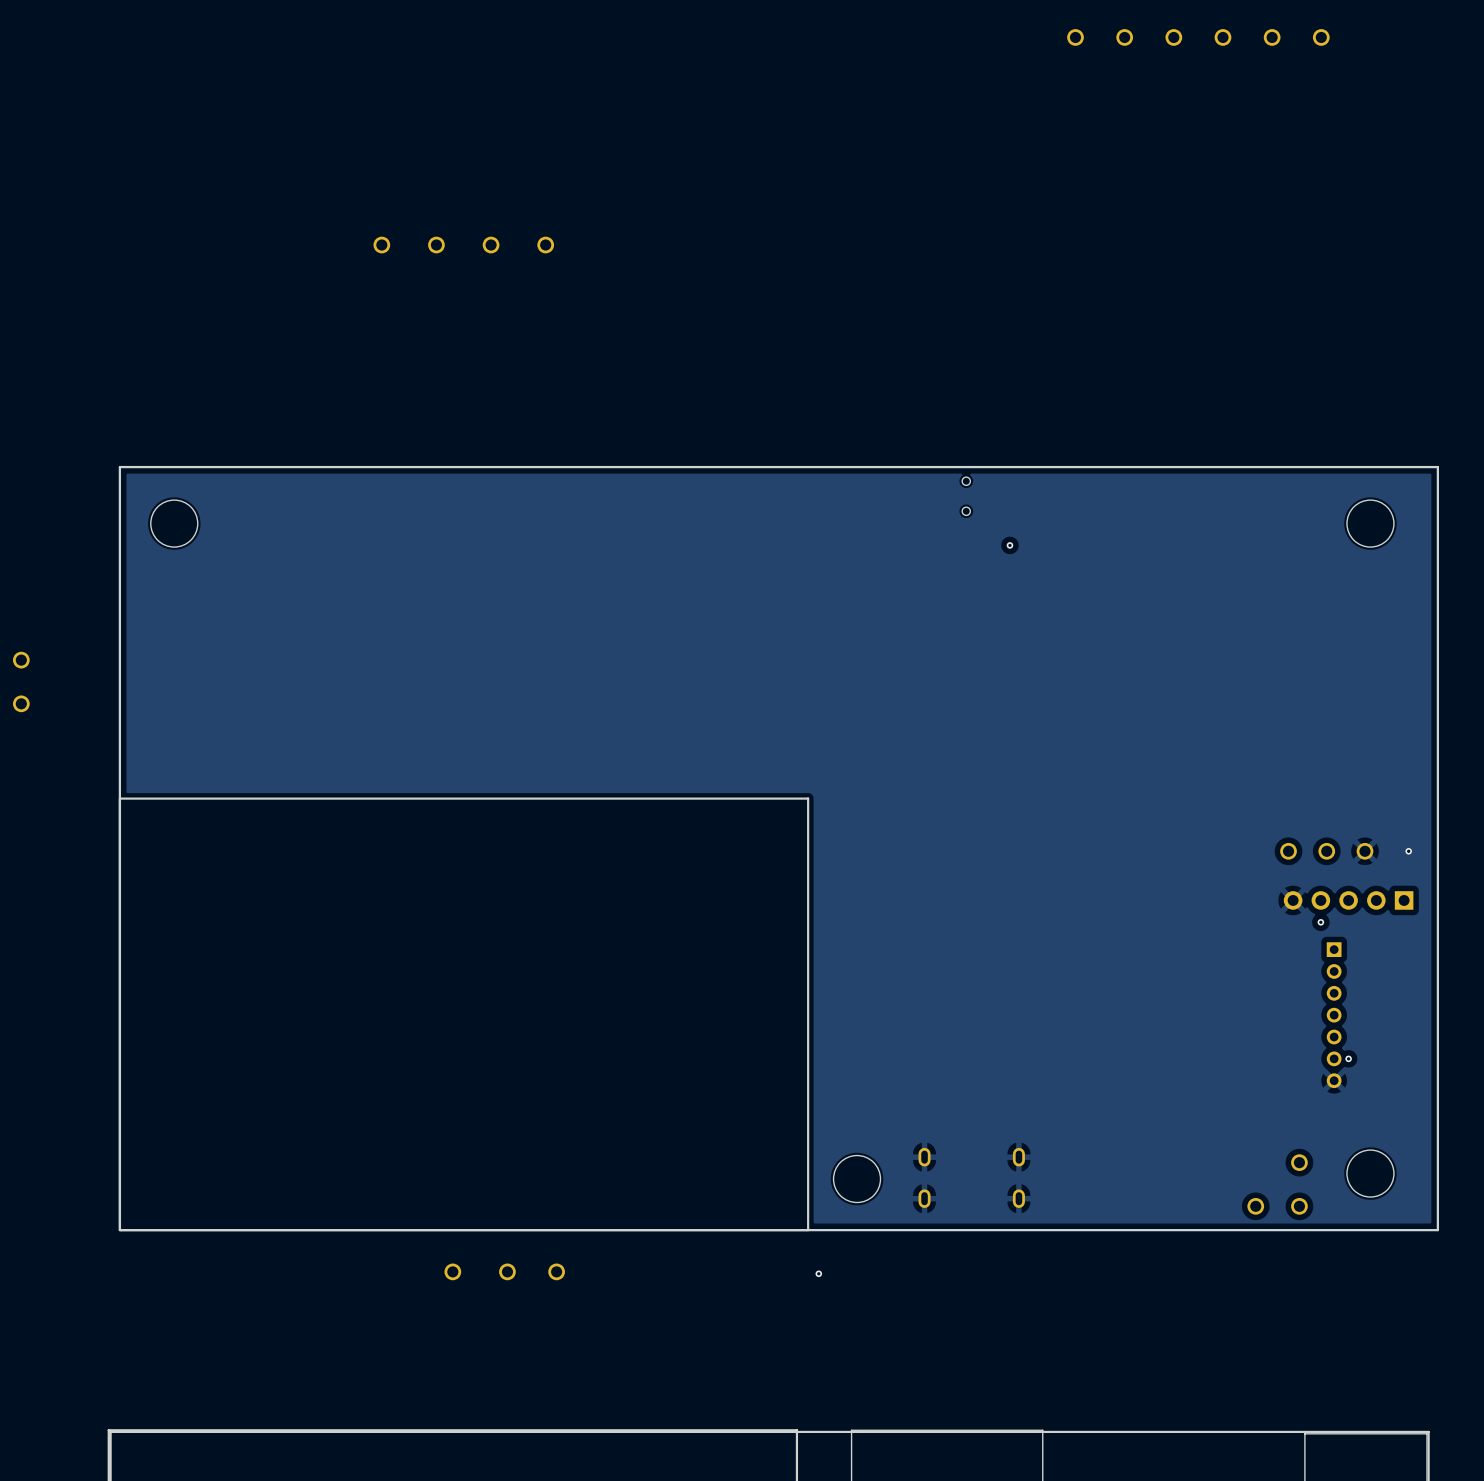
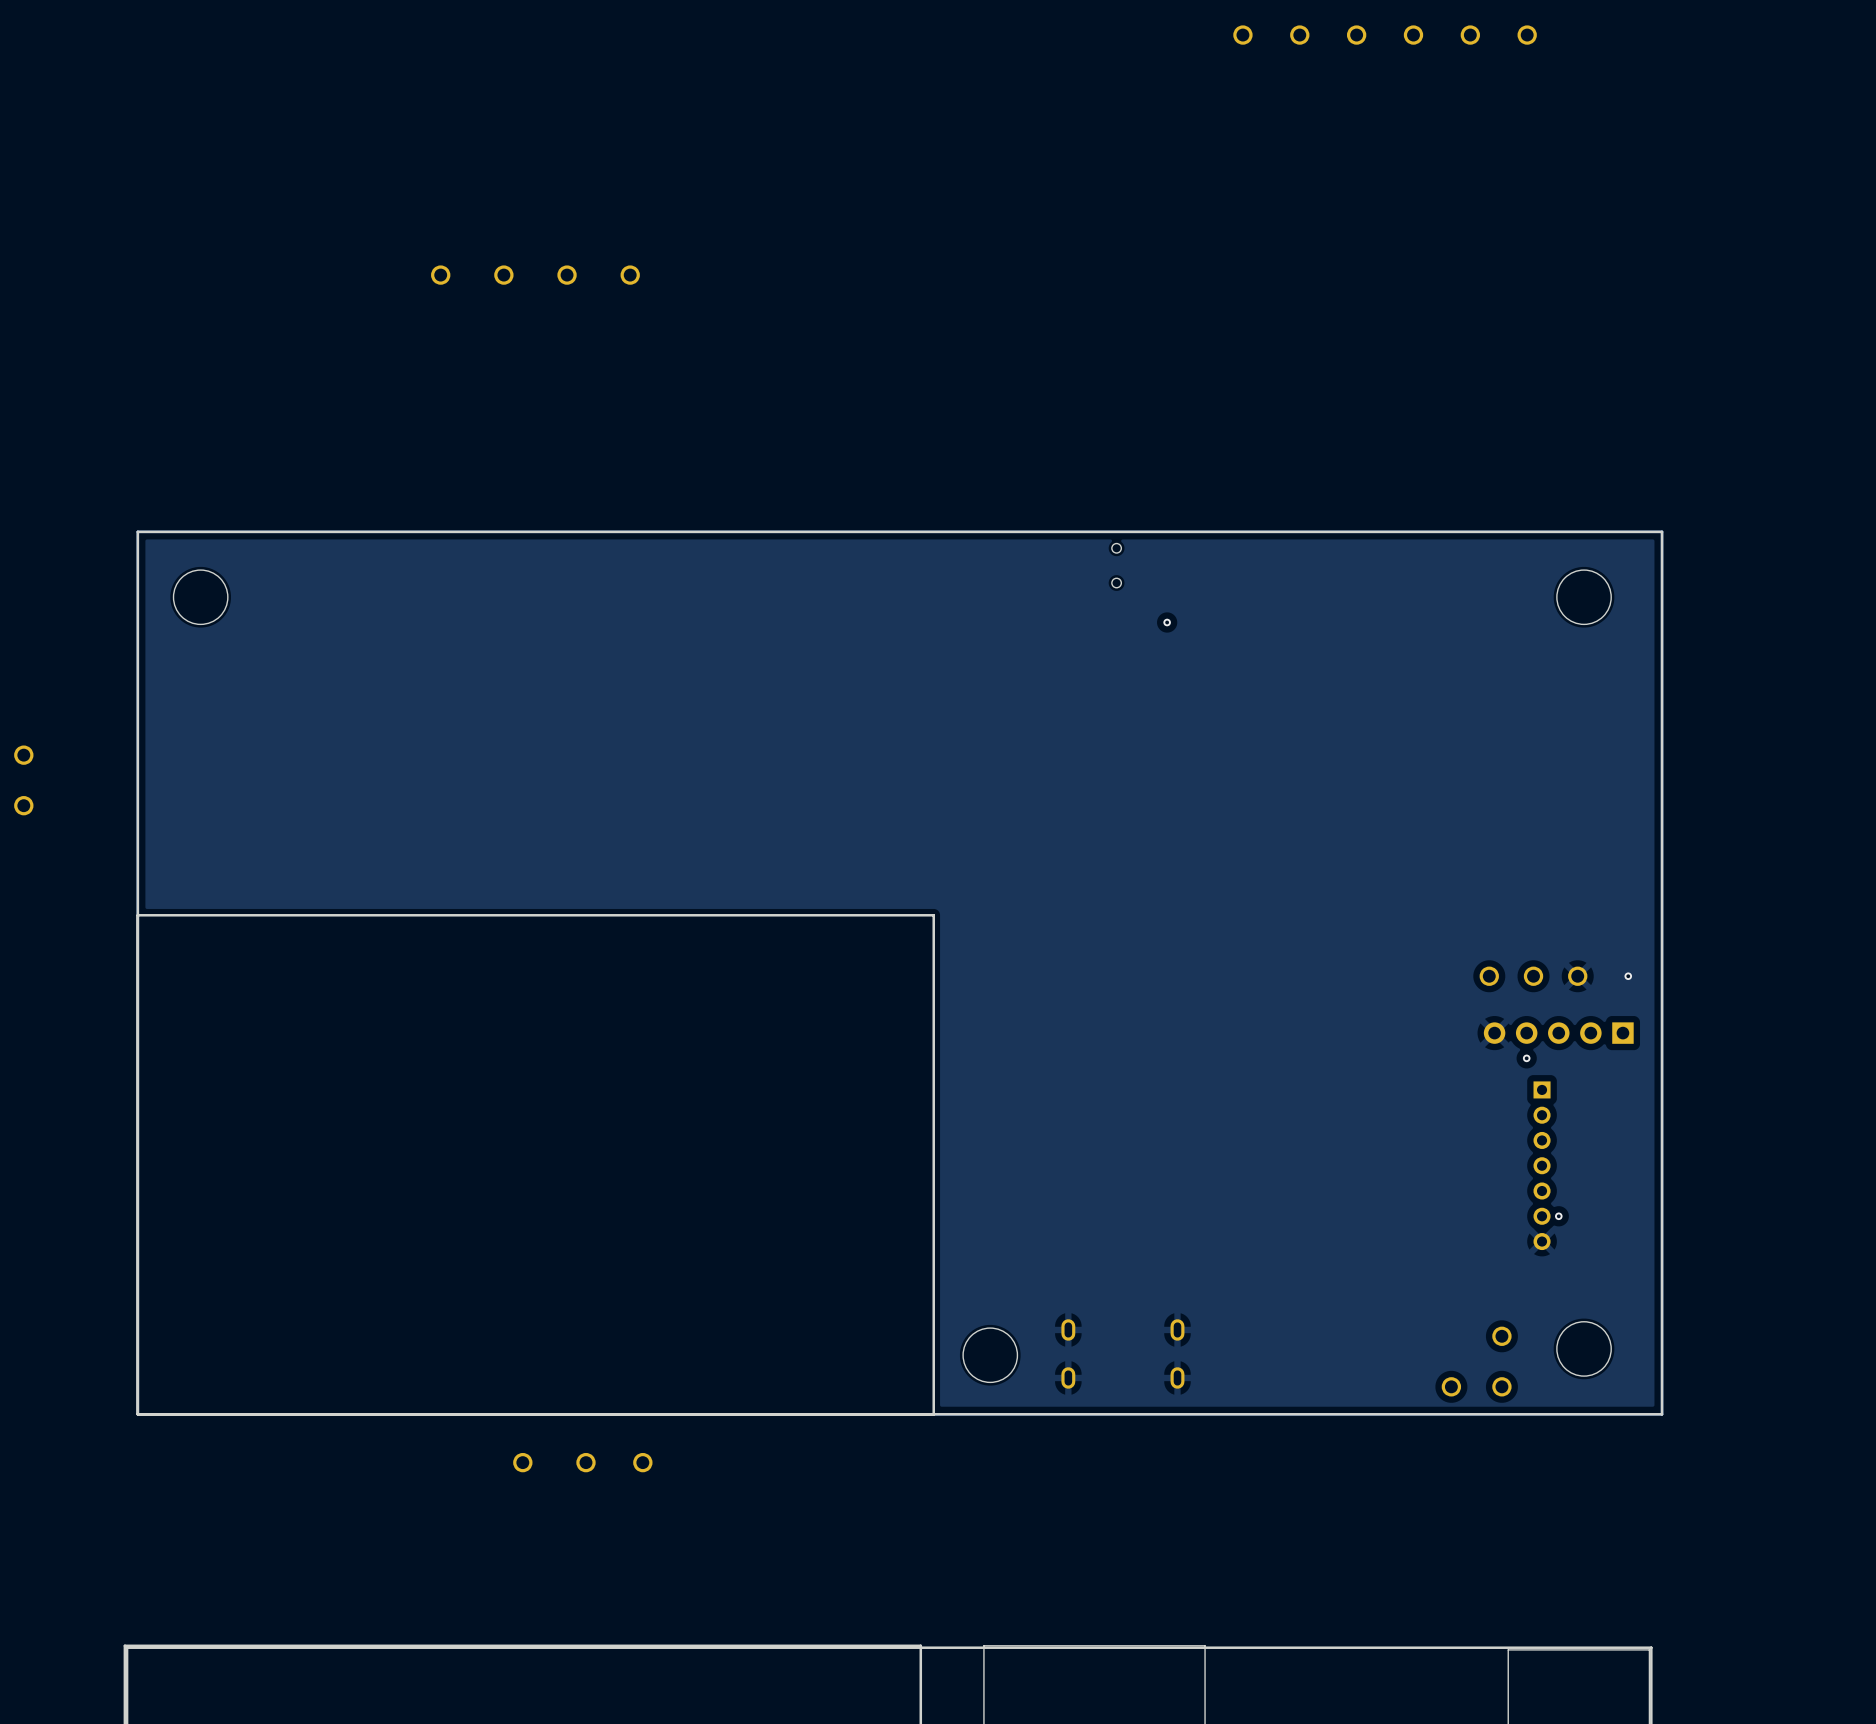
via: (818, 1273) -> none

